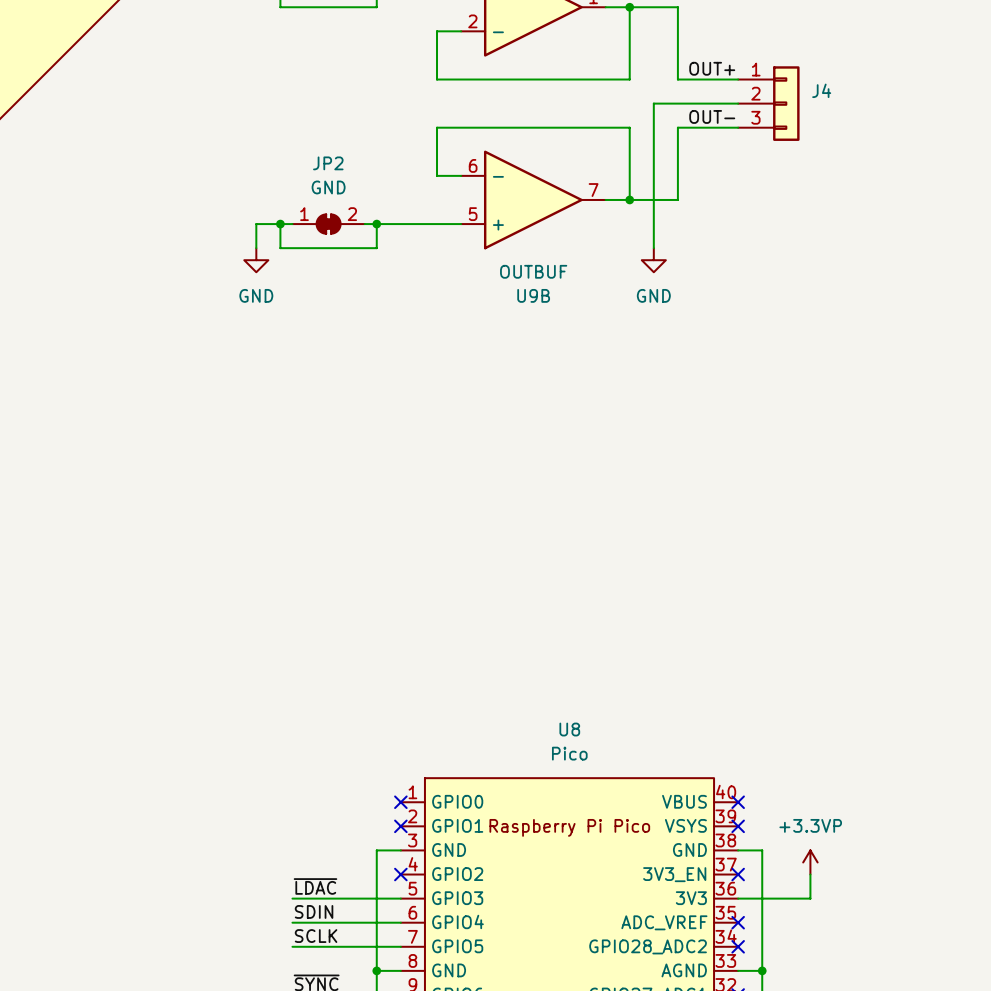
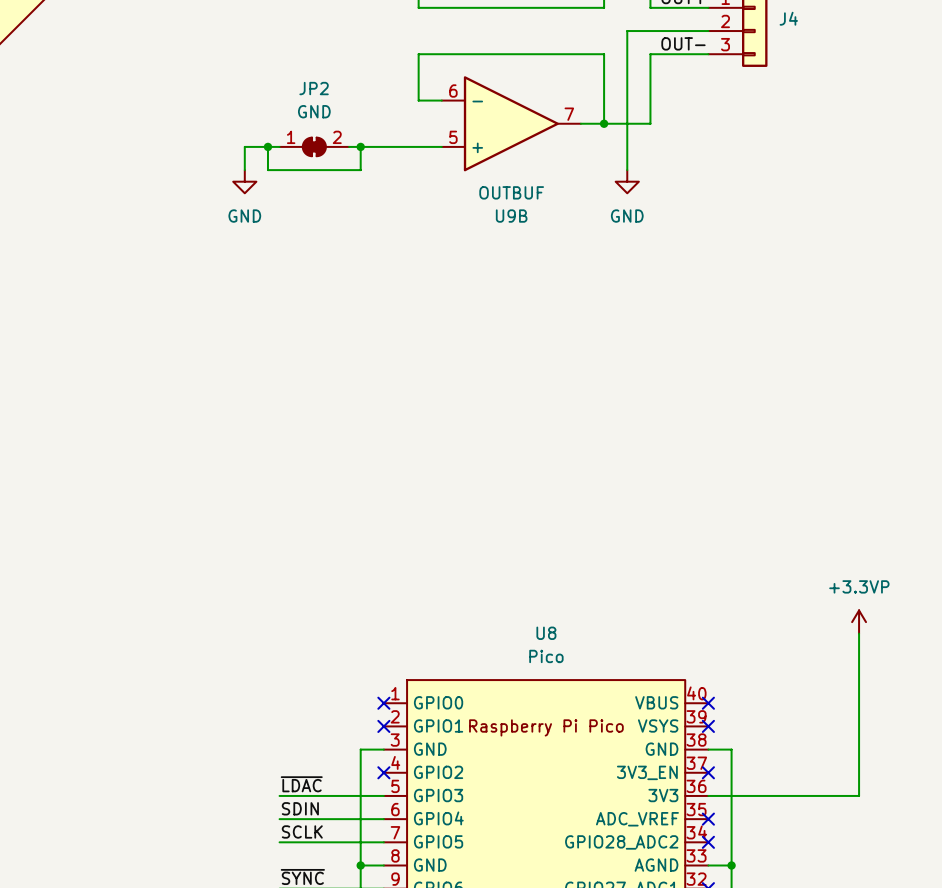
power symbol position: +3.3VP (810, 862) -> +3.3VP (859, 622)
wire: (810, 874) (810, 898) -> (859, 633) (859, 795) (777, 795)

